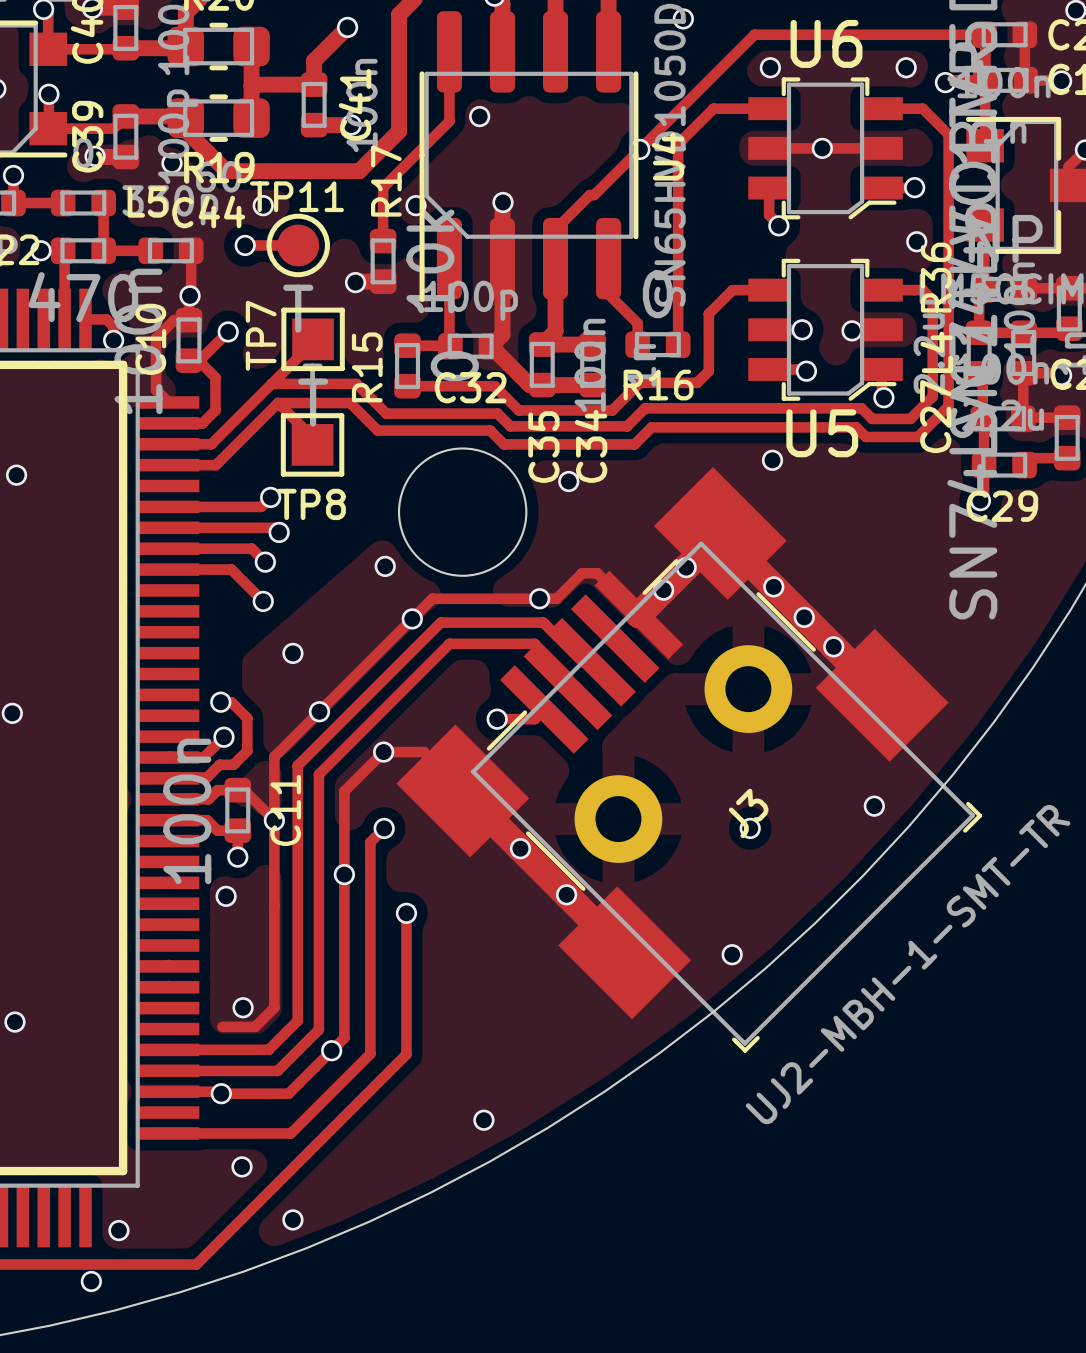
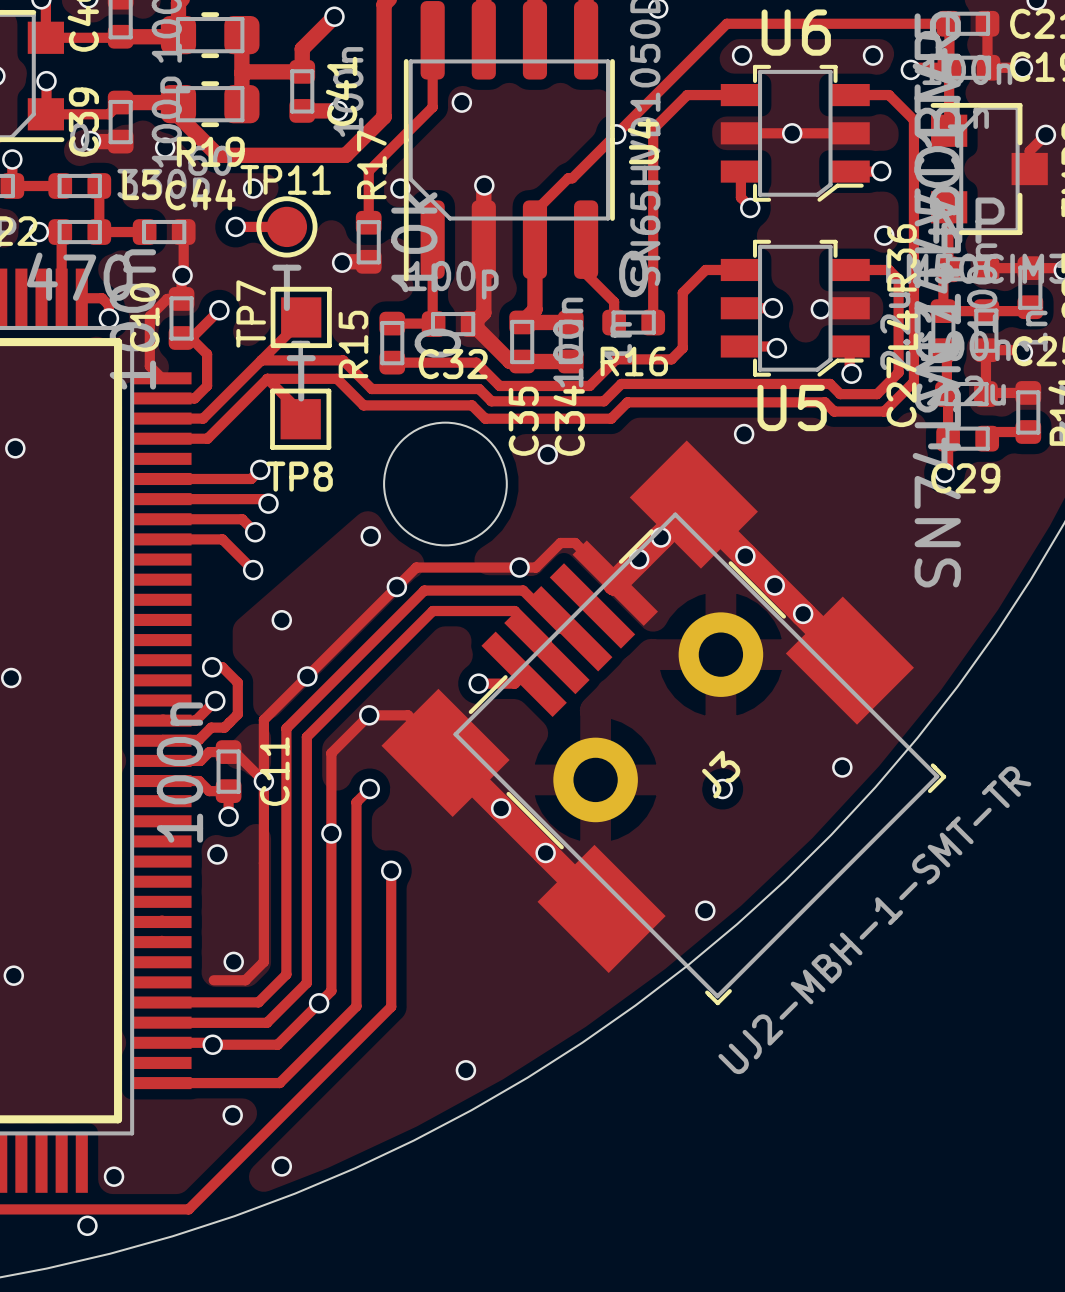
via position: (916, 241) -> (884, 235)

